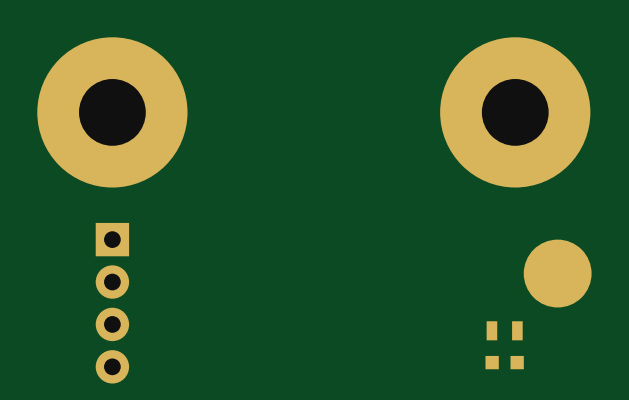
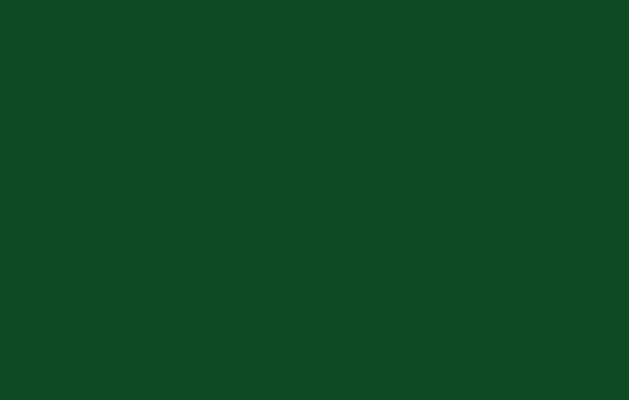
part: (112, 112) -> none
part: (515, 112) -> none
part: (557, 273) -> none
part: (112, 303) -> none
part: (504, 330) -> none
part: (504, 362) -> none

